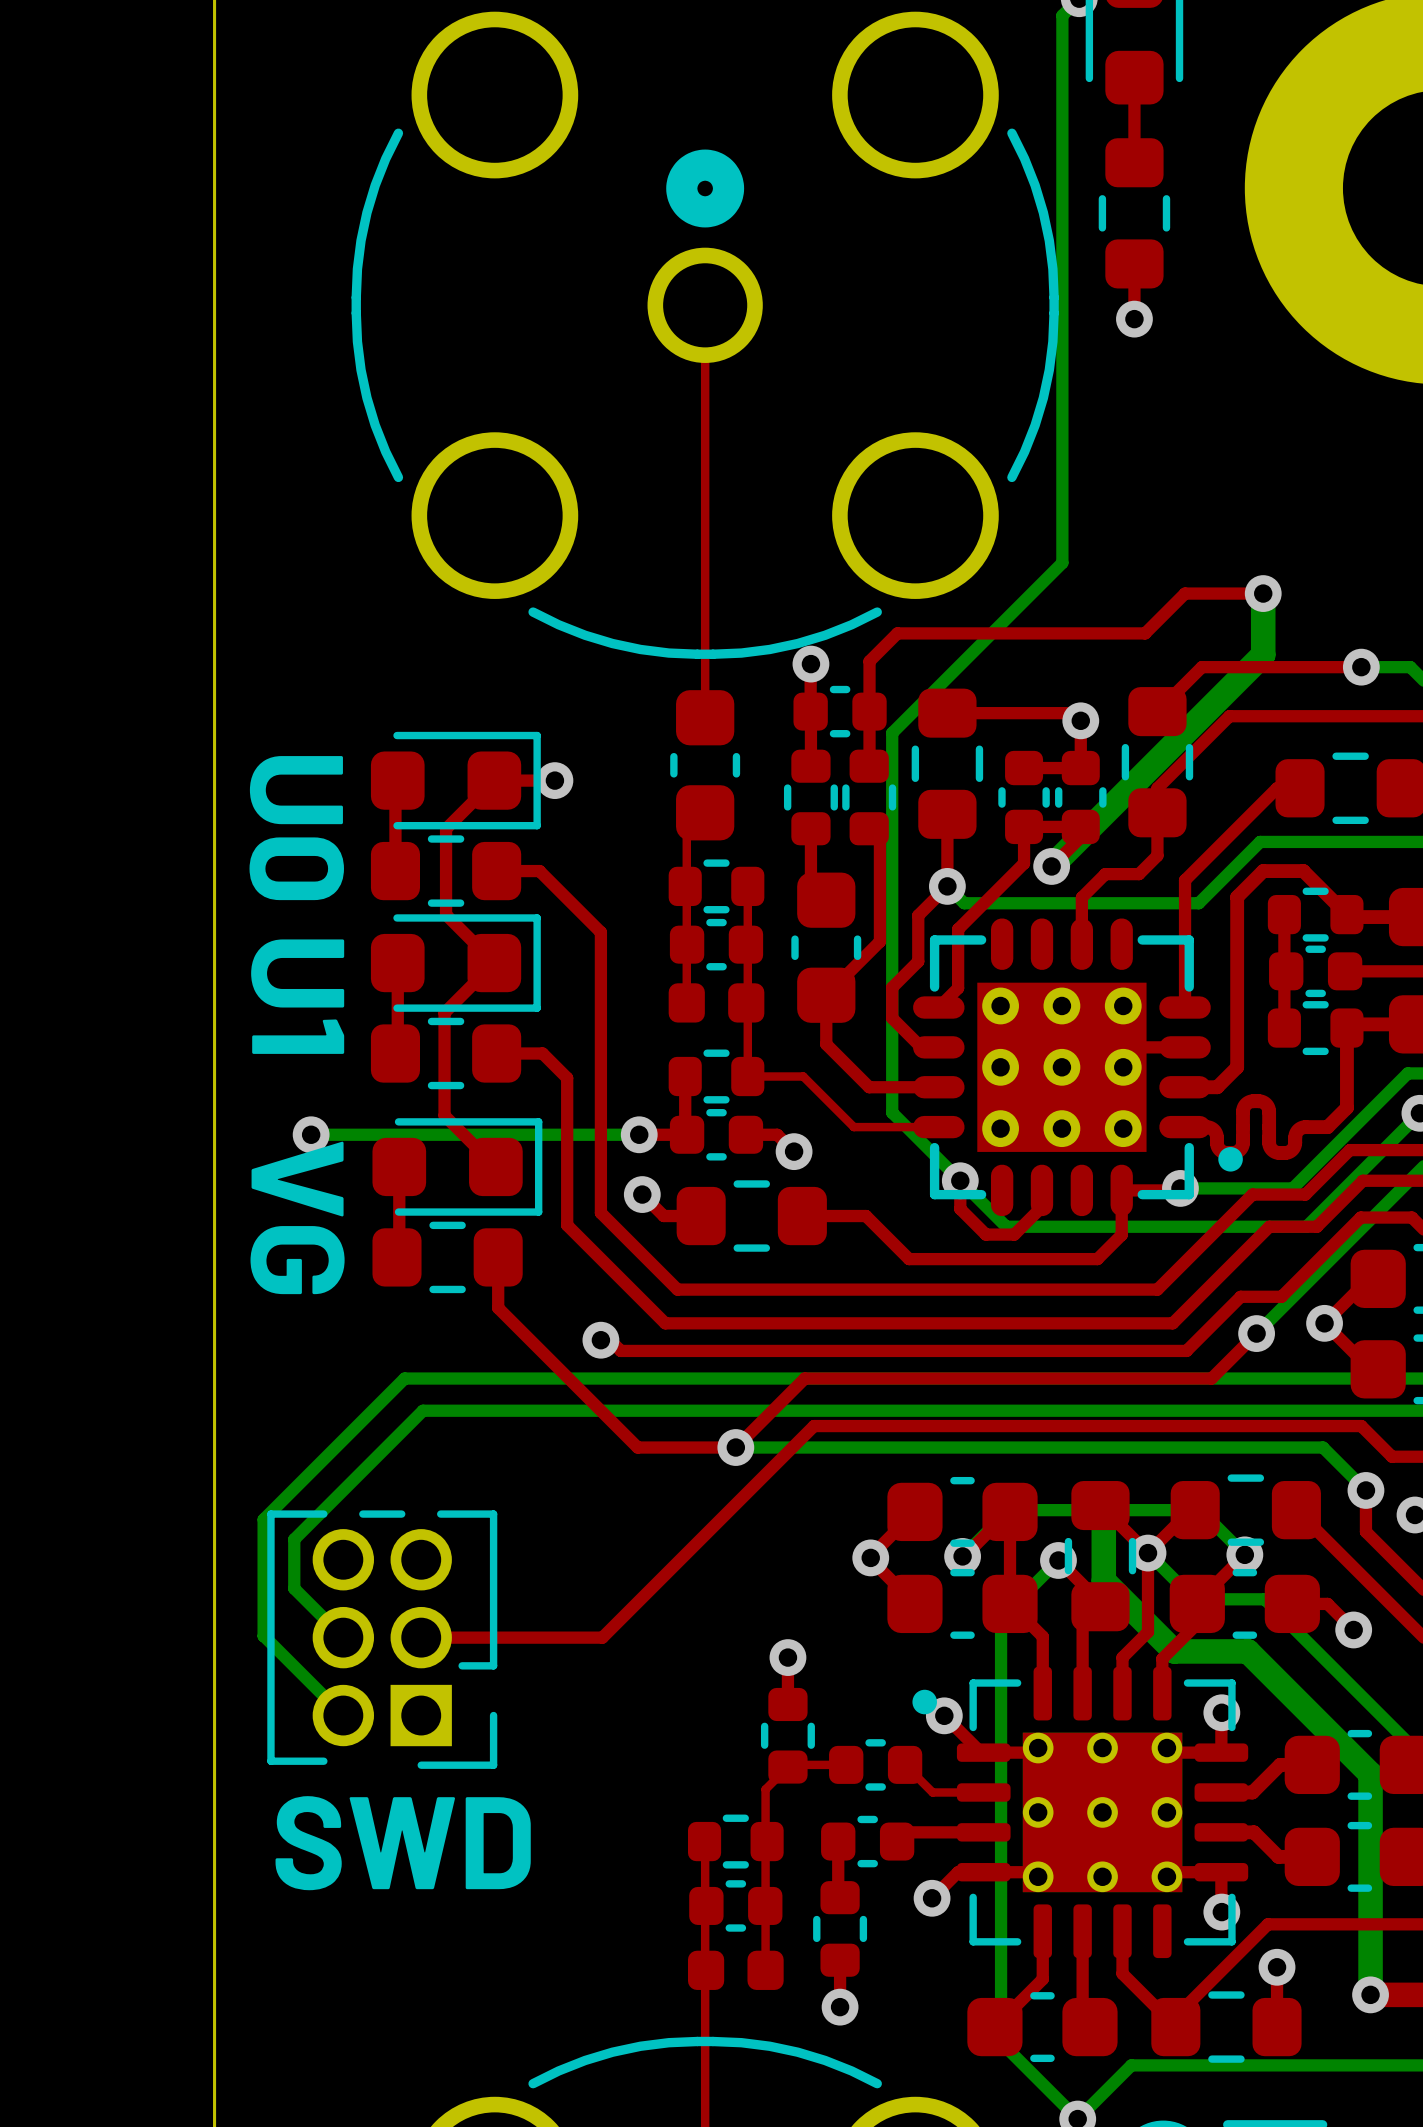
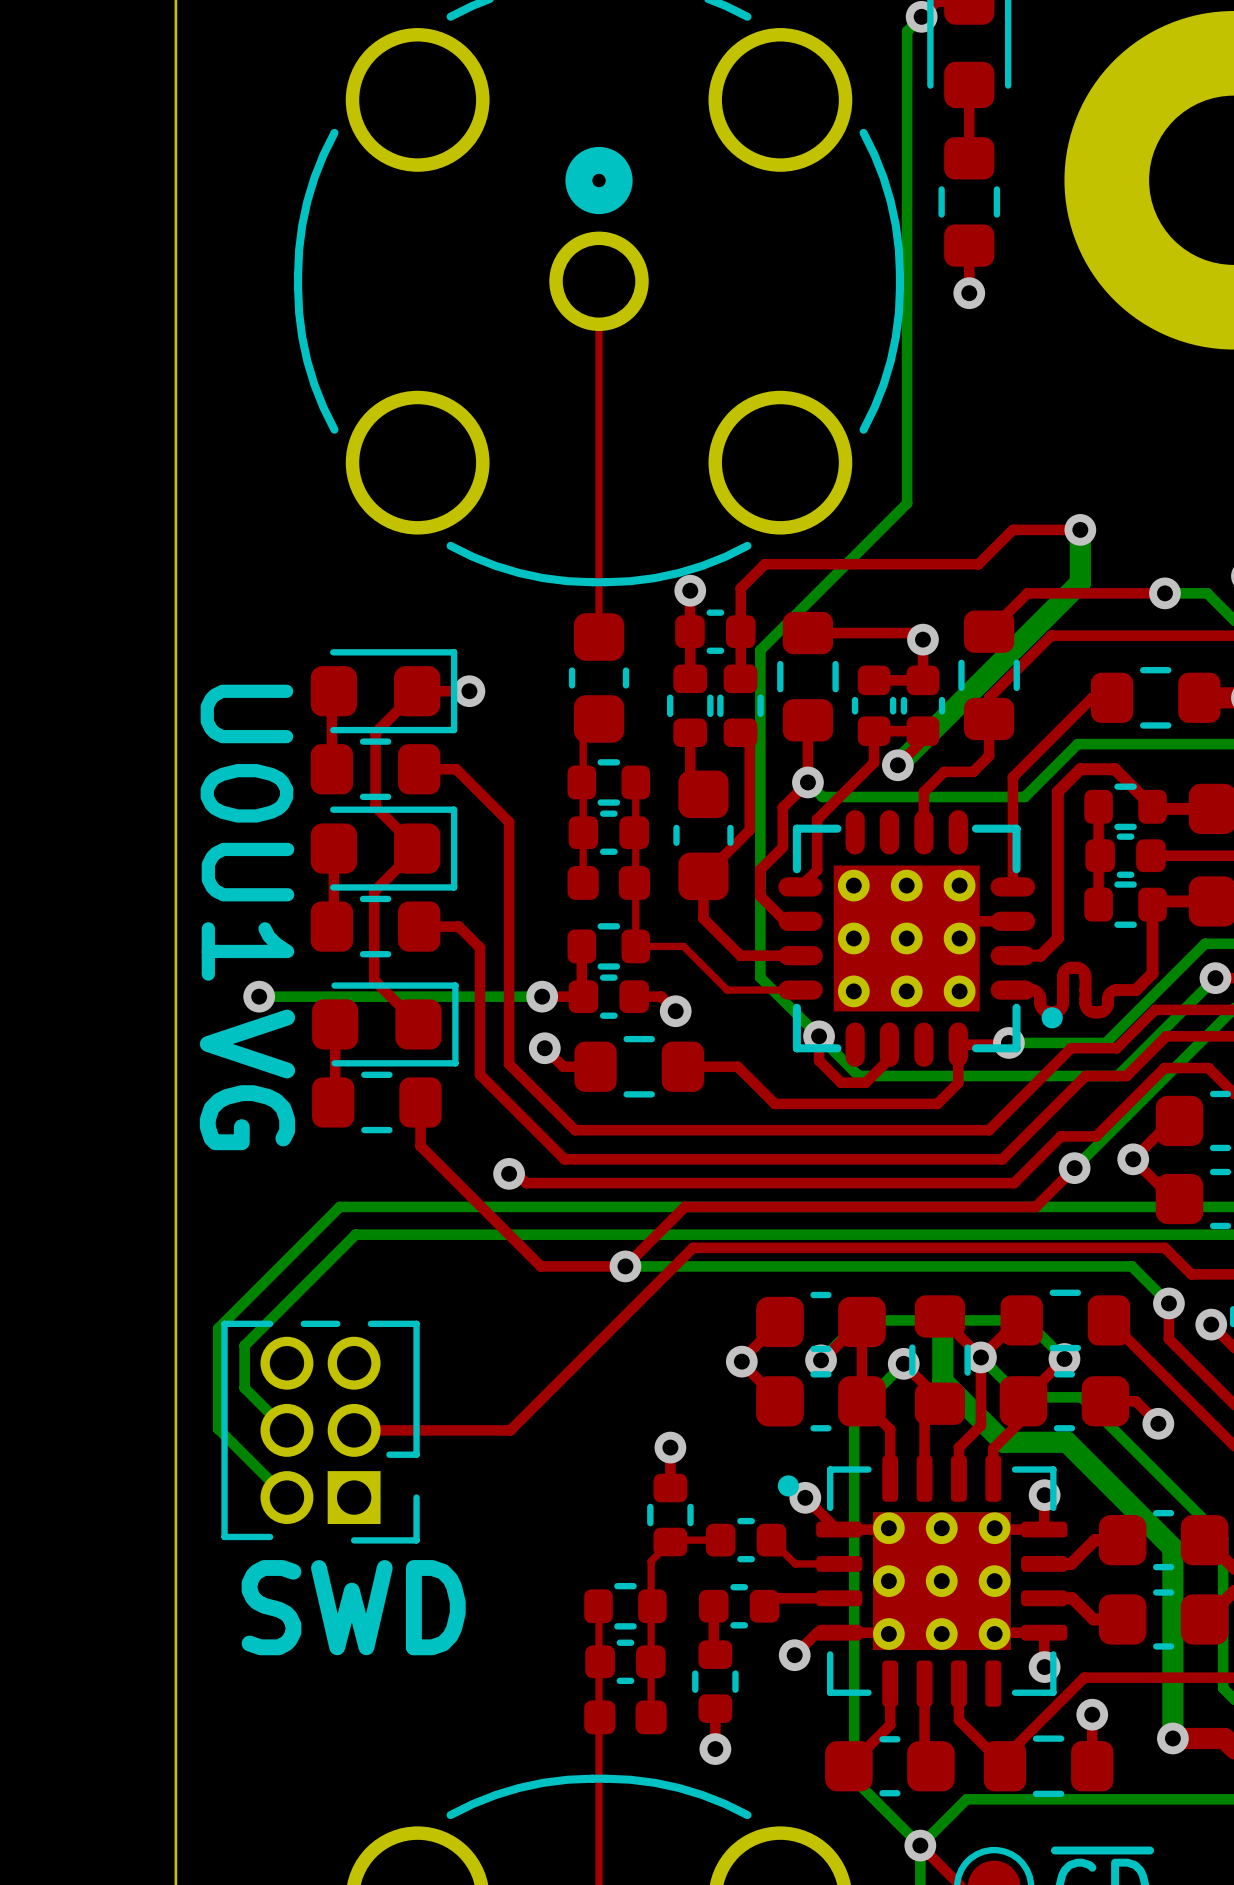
part footprint: [912, 1666, 1249, 1959] -> [777, 1455, 1068, 1707]

